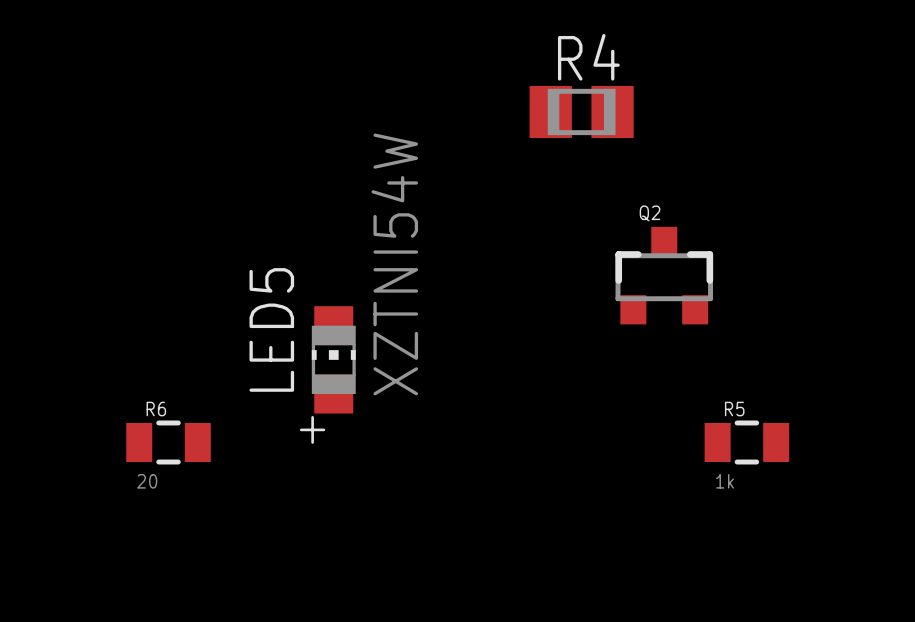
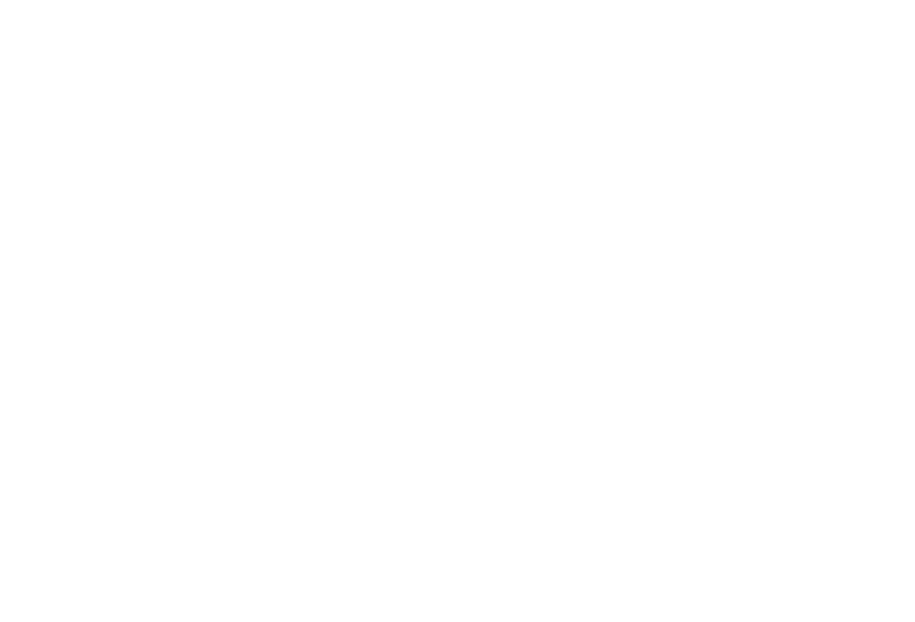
R4: (581, 111) -> none
Q2: (664, 275) -> none
LED5: XZTNI54W (333, 359) -> none
R6: 20 (168, 442) -> none
R5: 1k (746, 442) -> none

